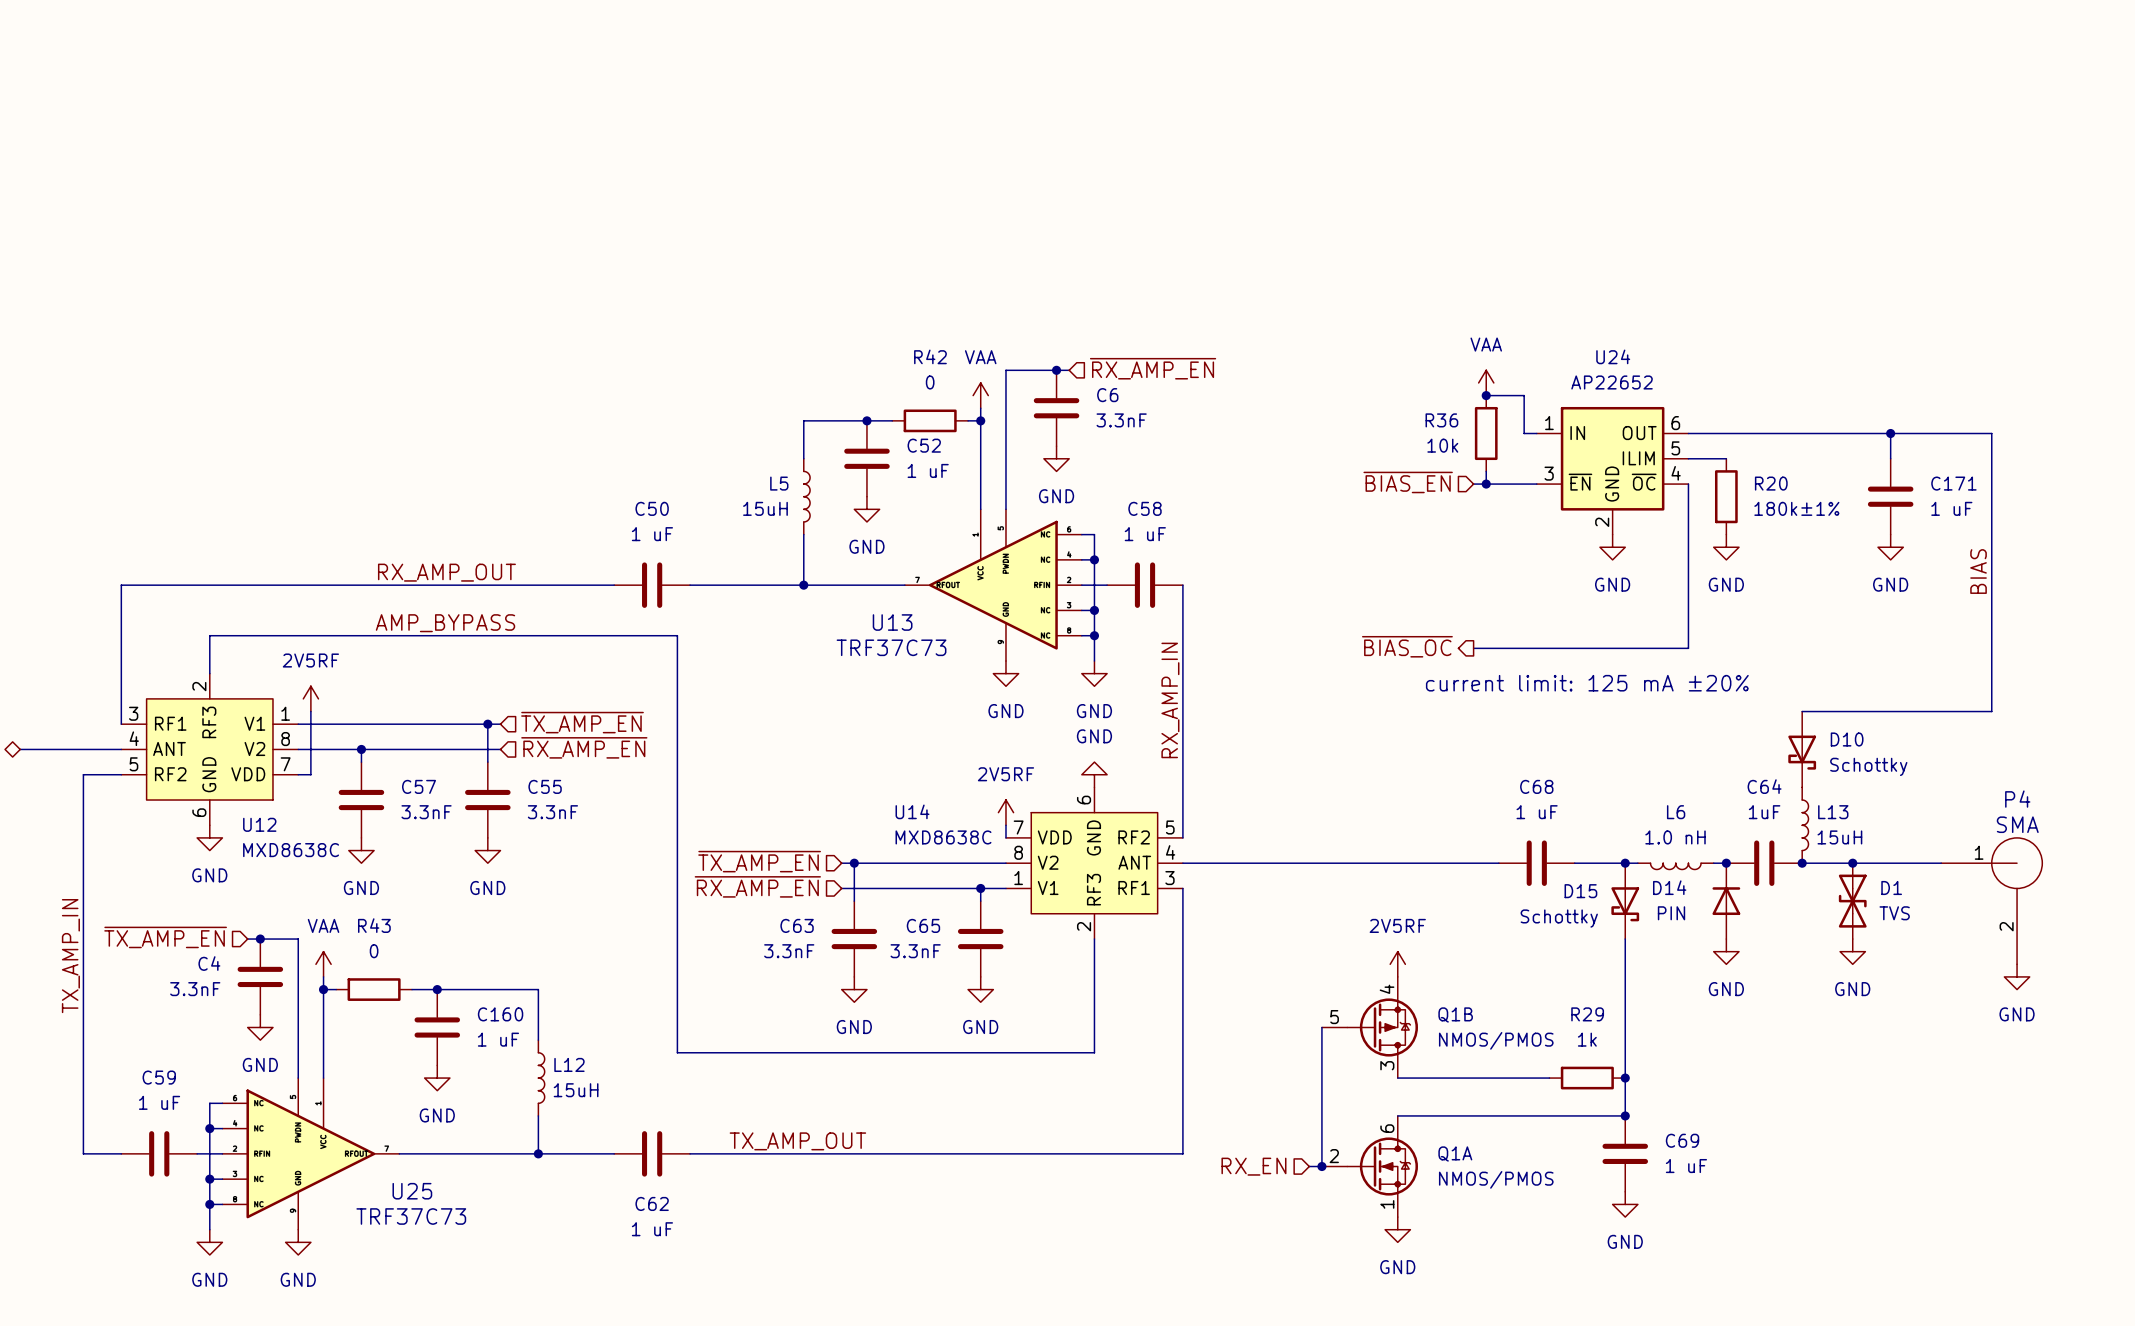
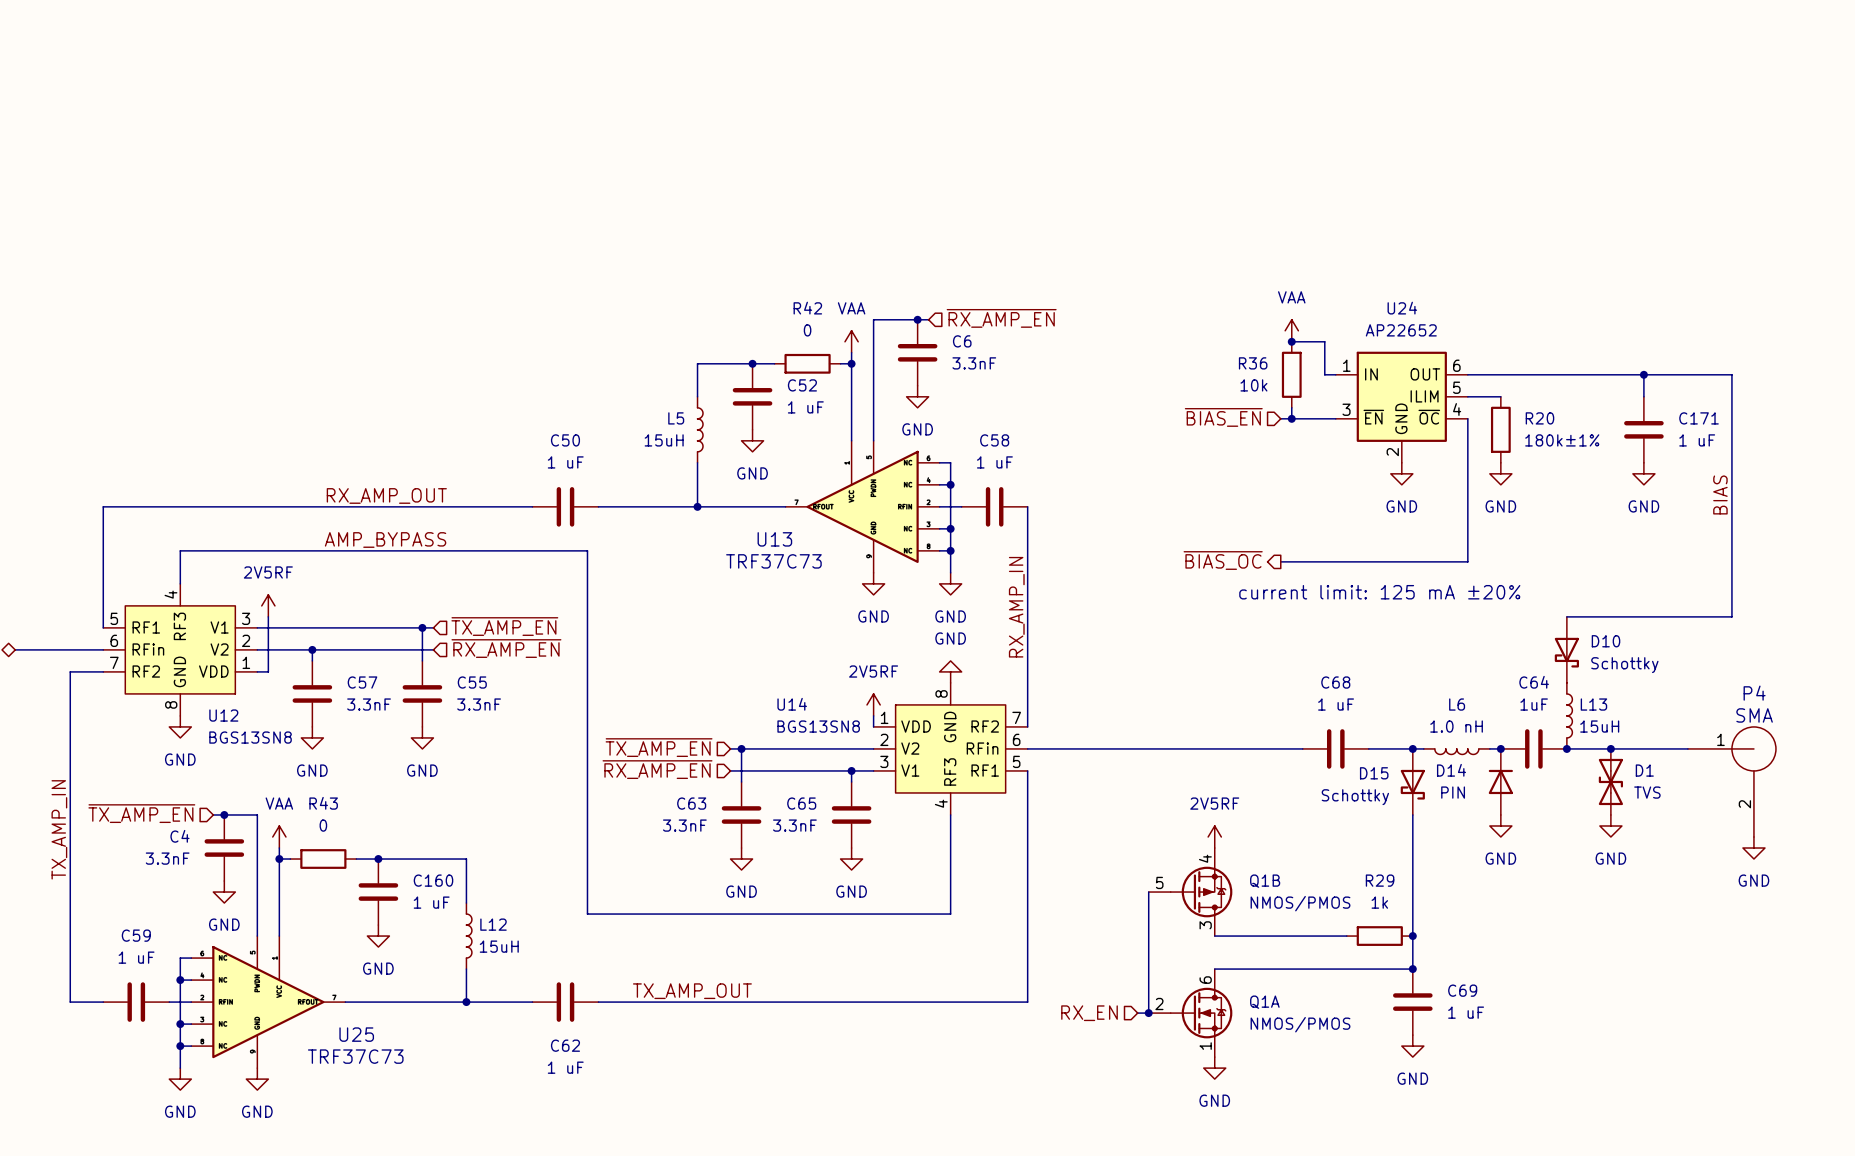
U12 symbol: [121, 673, 299, 826] -> [103, 583, 258, 716]
U14 symbol: [1005, 787, 1183, 940] -> [873, 682, 1028, 815]
U14 value: MXD8638C (943, 837) -> BGS13SN8 (818, 726)
U12 value: MXD8638C (291, 850) -> BGS13SN8 (250, 737)

